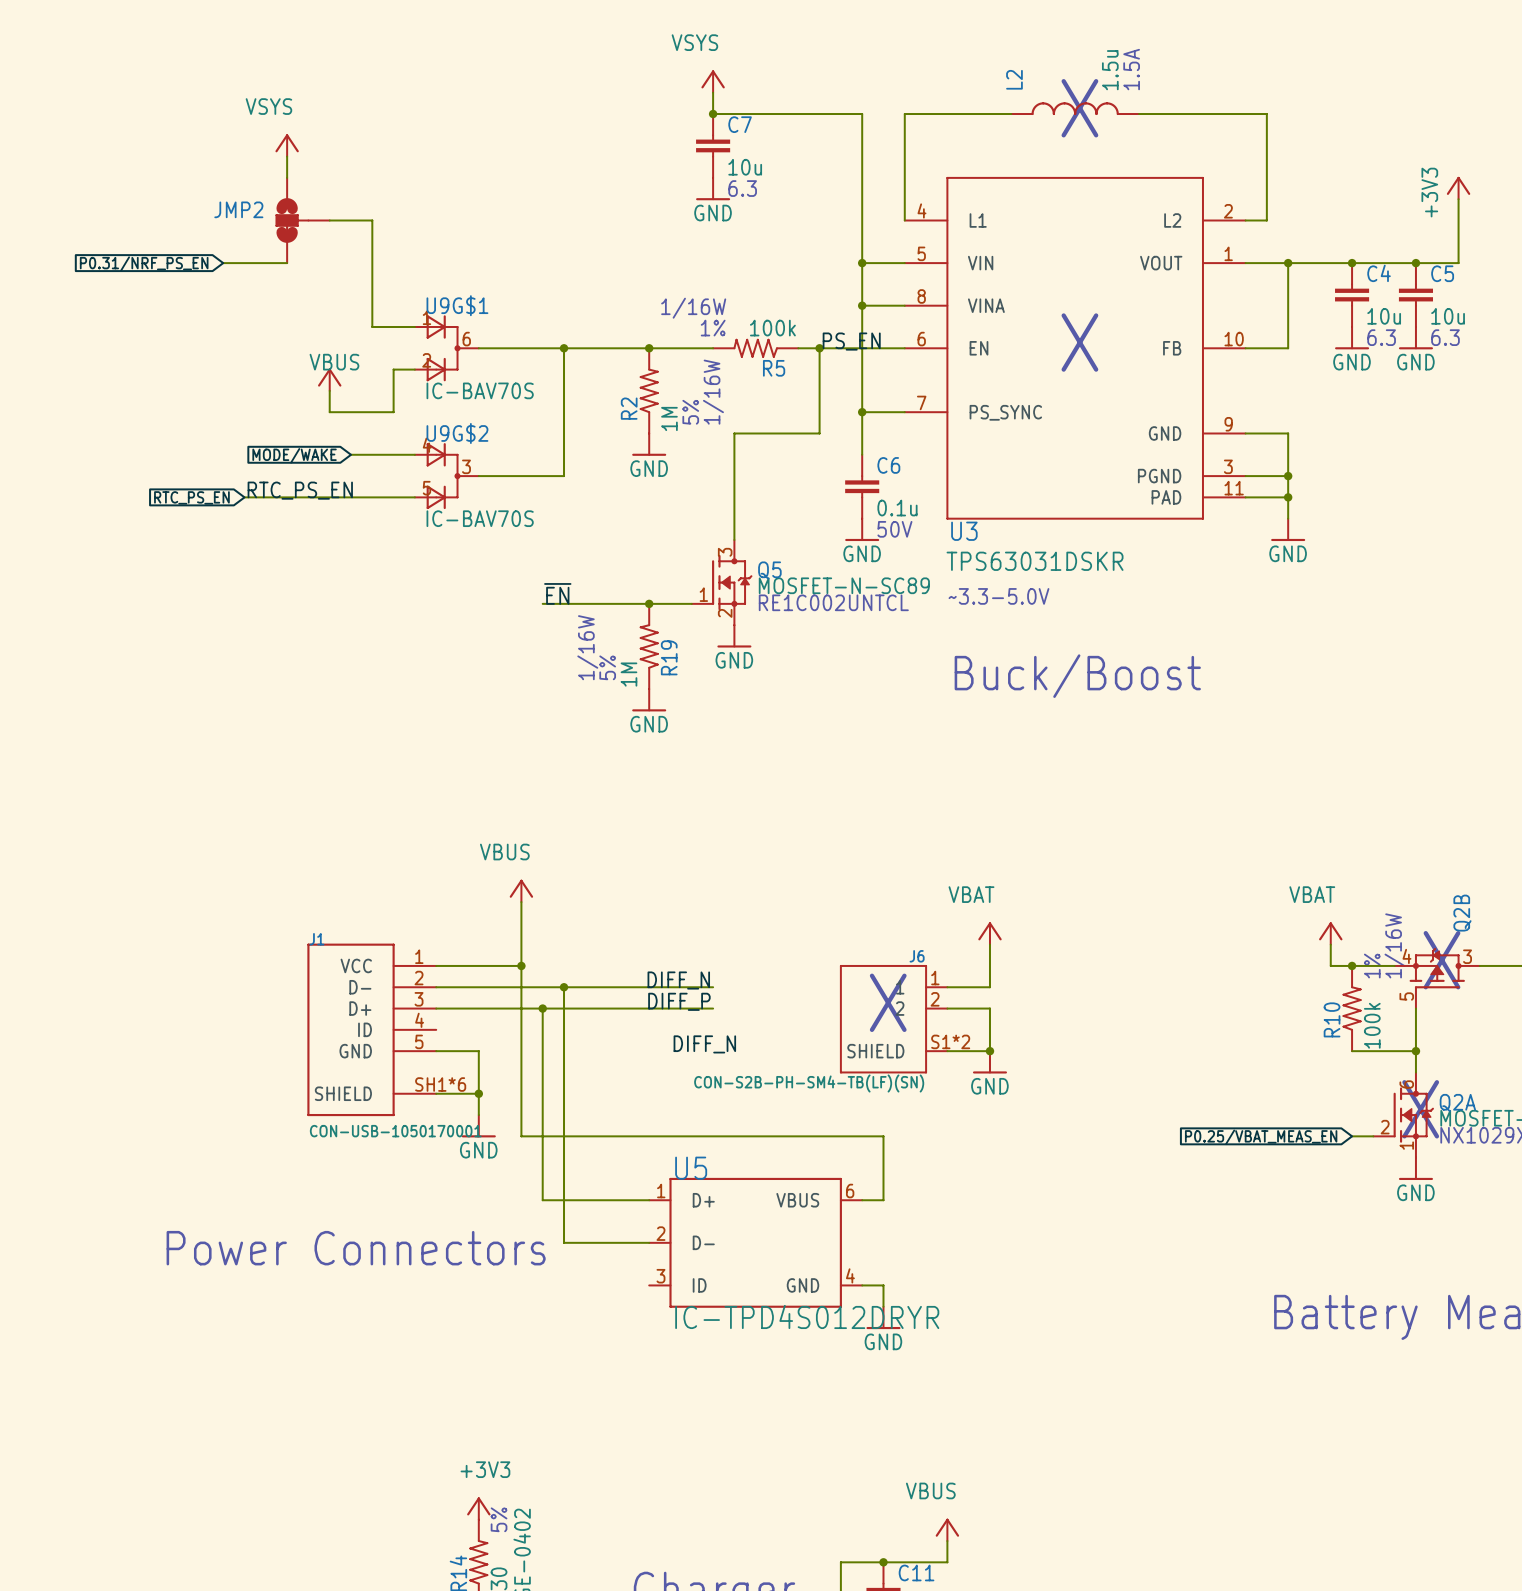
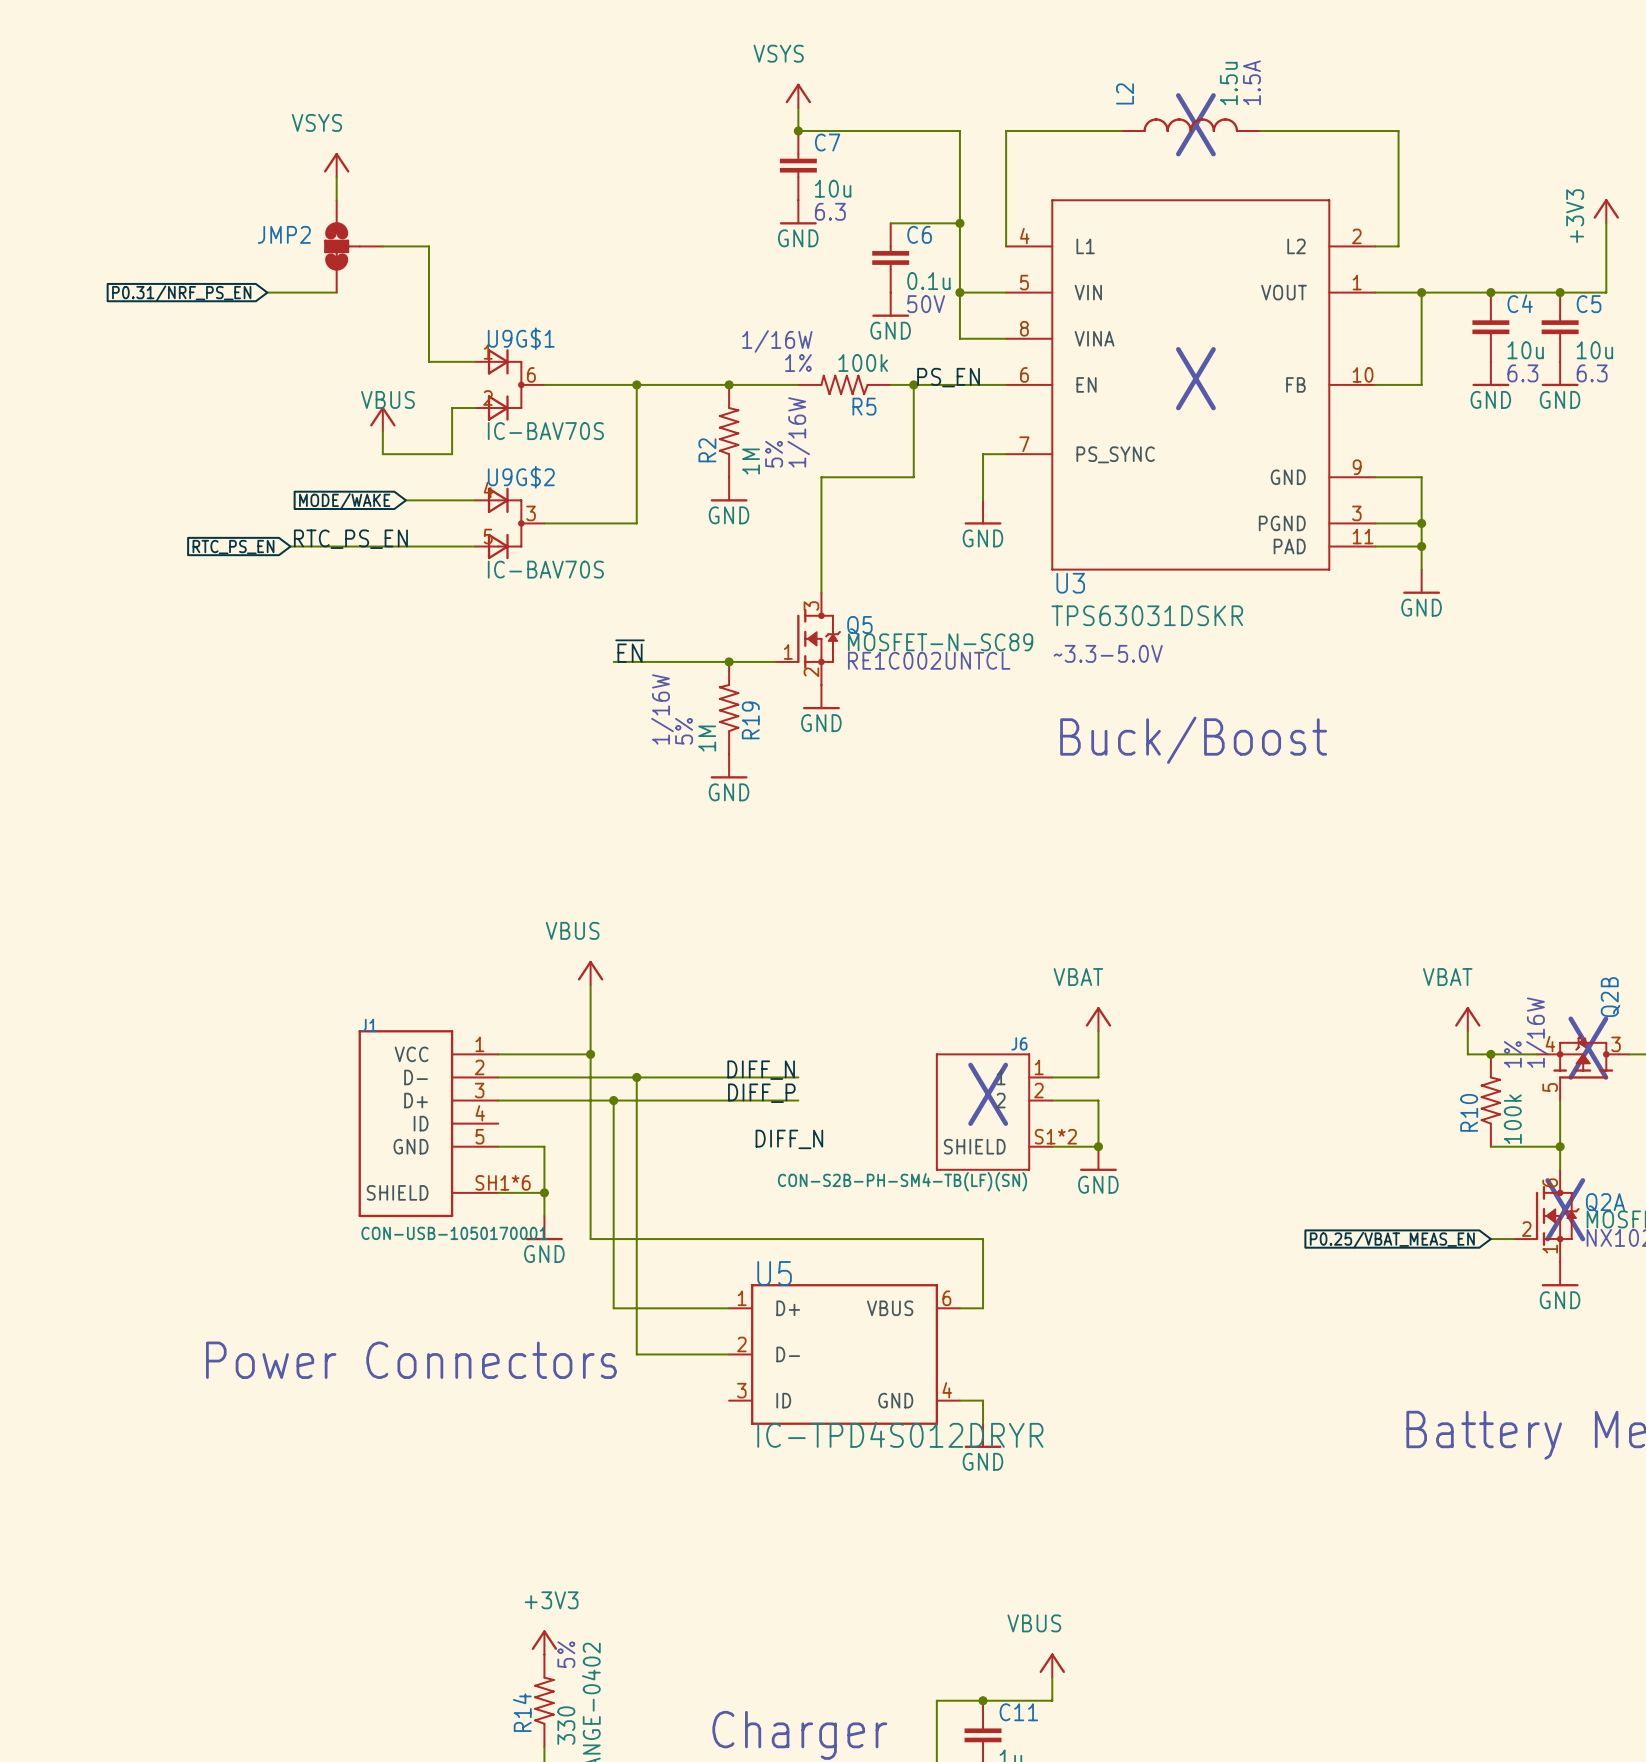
wire: none -> (890, 223) (959, 223)
junction: none -> (959, 223)
power symbol: none -> GND (890, 304)
wire: (862, 305) (862, 454) -> none
junction: (862, 305) -> none
wire: (862, 412) (883, 412) -> (983, 500) (983, 454)
junction: (862, 412) -> none
C6 position: (862, 486) -> (890, 257)
power symbol position: GND (862, 529) -> GND (983, 512)

